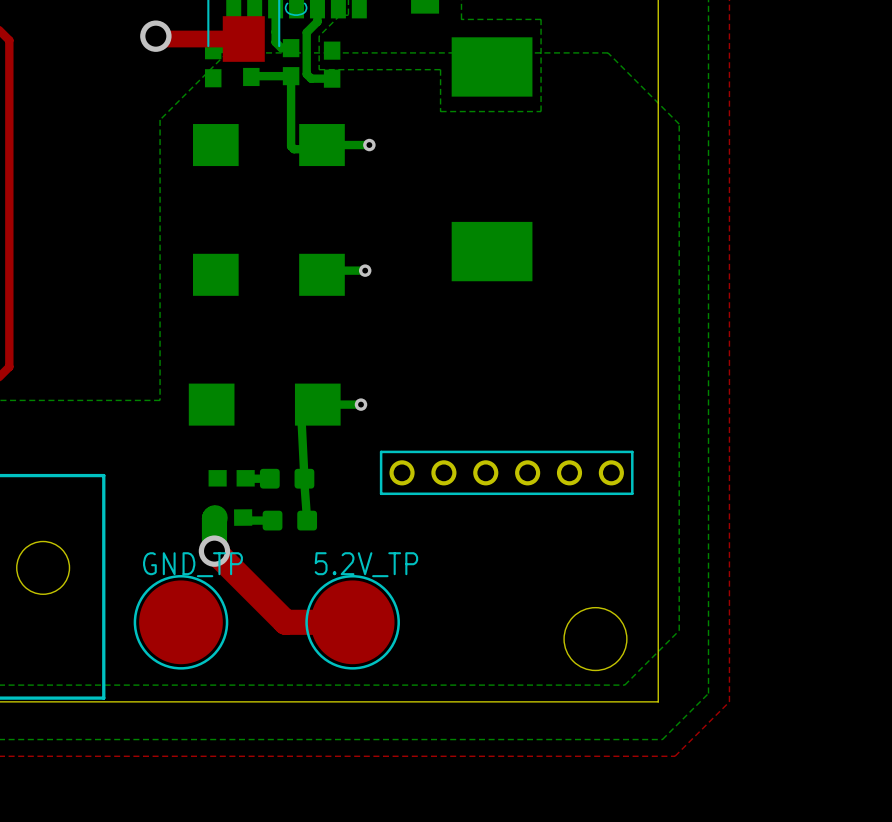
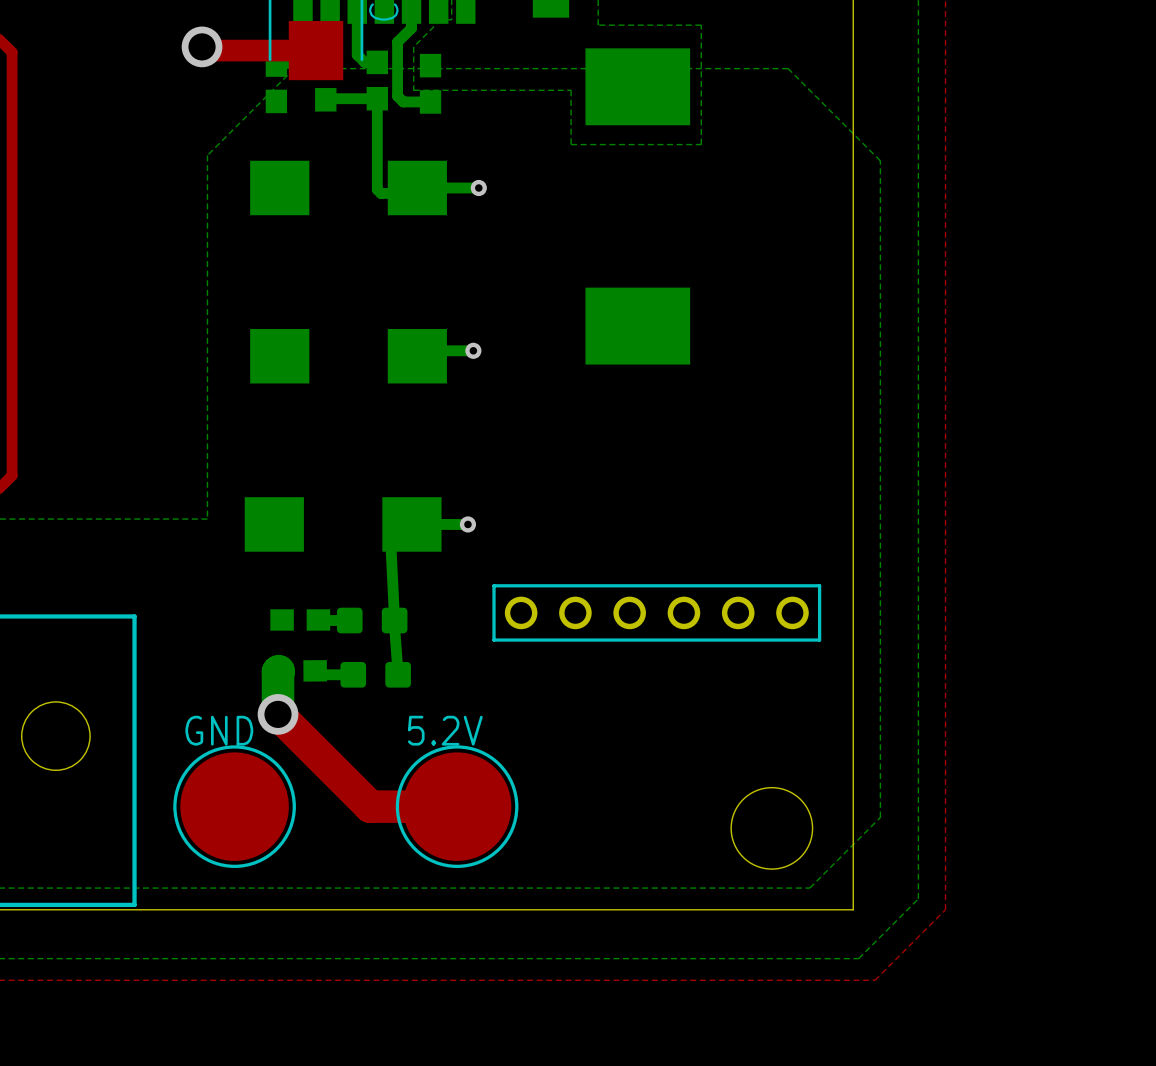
GND_TP name: GND_TP (192, 564) -> GND (219, 730)
5.2V_TP name: 5.2V_TP (366, 564) -> 5.2V (445, 730)

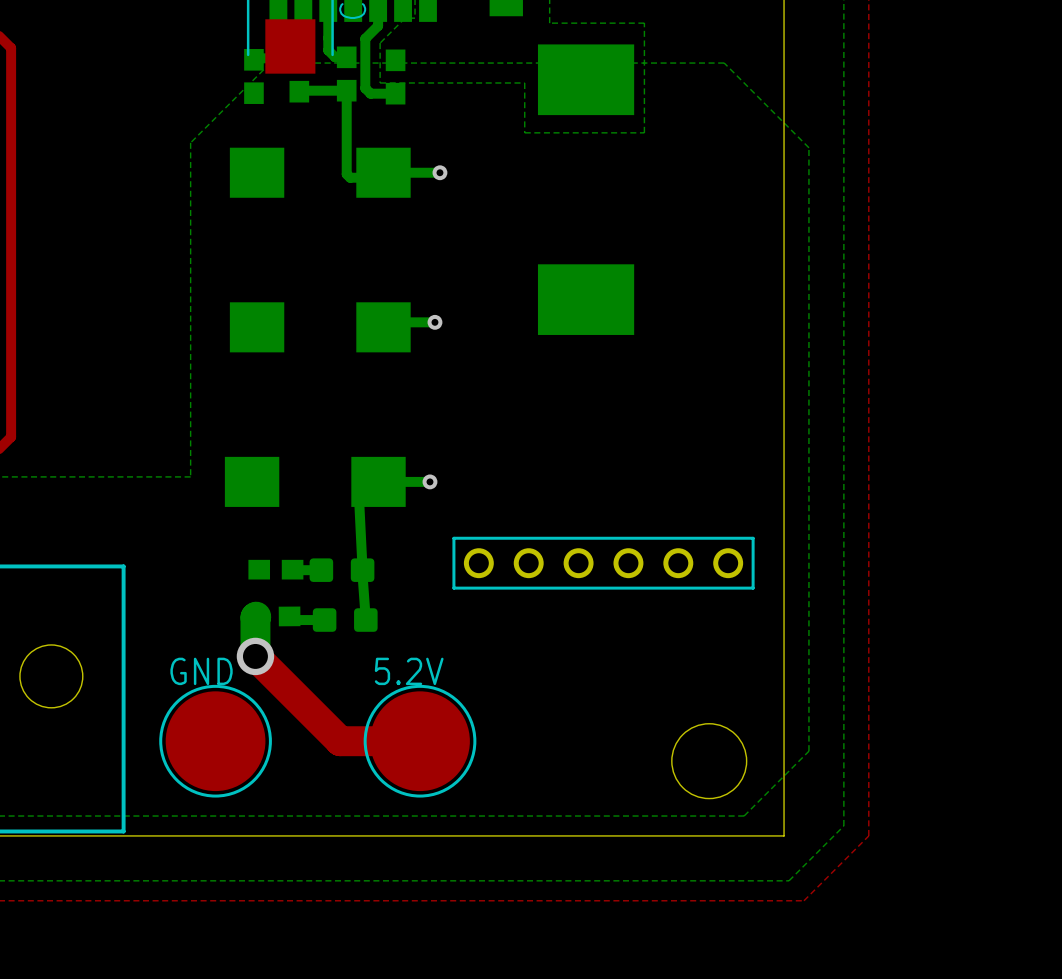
top track: (202, 46) (205, 50) (316, 50) -> none
via: (202, 46) -> none

